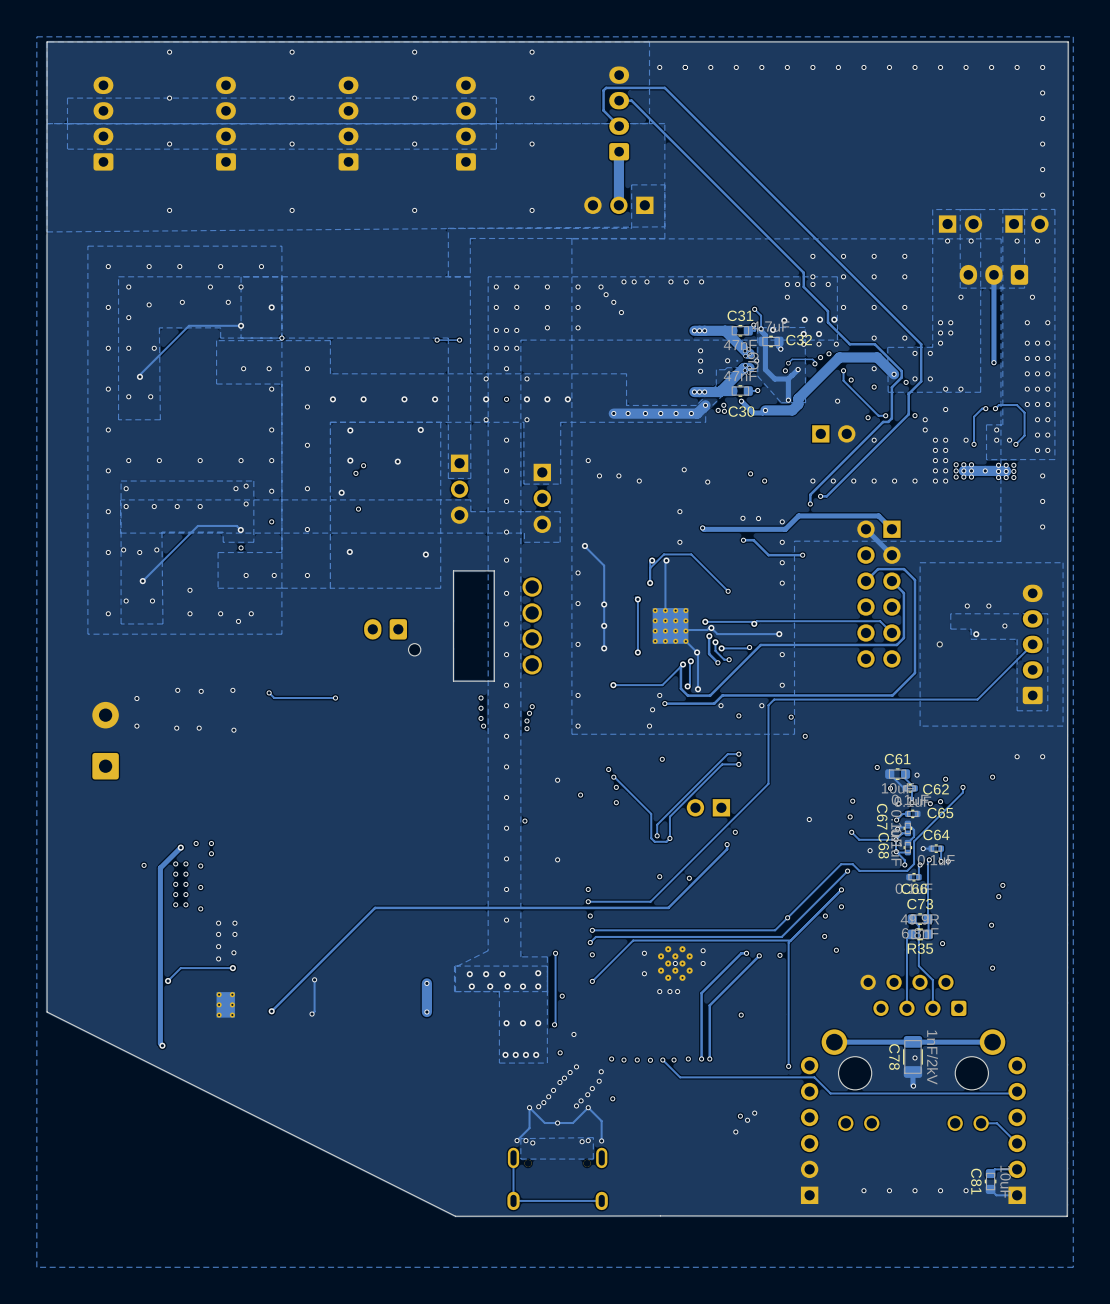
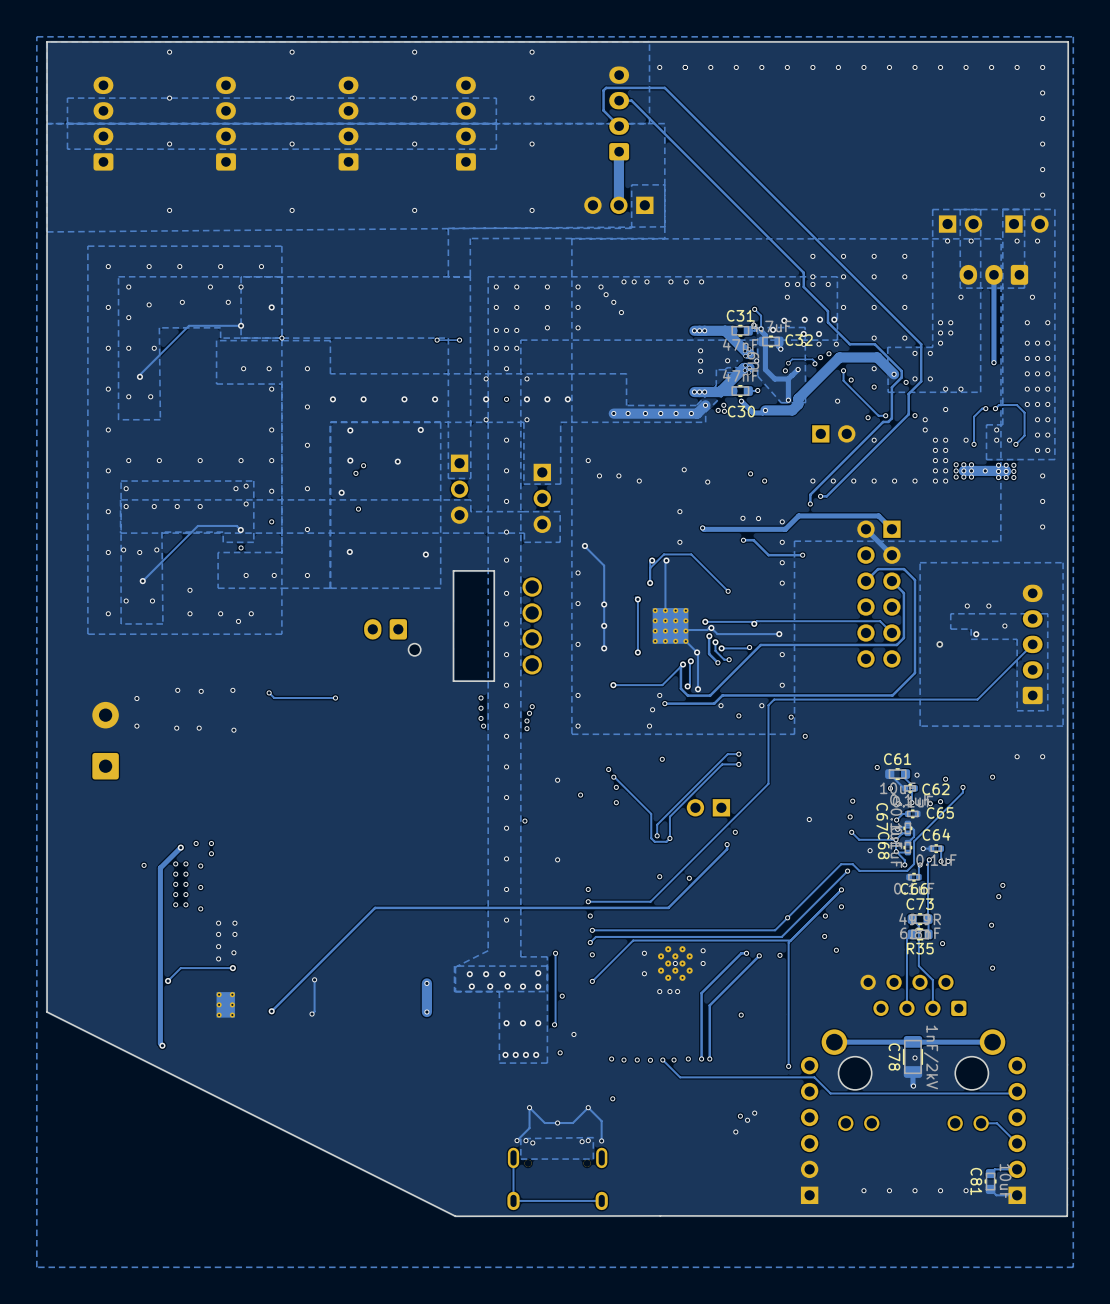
via: (576, 1066) -> none
via: (601, 1071) -> none
via: (570, 1072) -> none
via: (564, 1078) -> none
via: (599, 1081) -> none
via: (559, 1082) -> none
via: (592, 1088) -> none
via: (553, 1090) -> none
via: (587, 1094) -> none
via: (548, 1096) -> none
via: (581, 1100) -> none
via: (543, 1102) -> none
via: (576, 1105) -> none
via: (538, 1106) -> none

